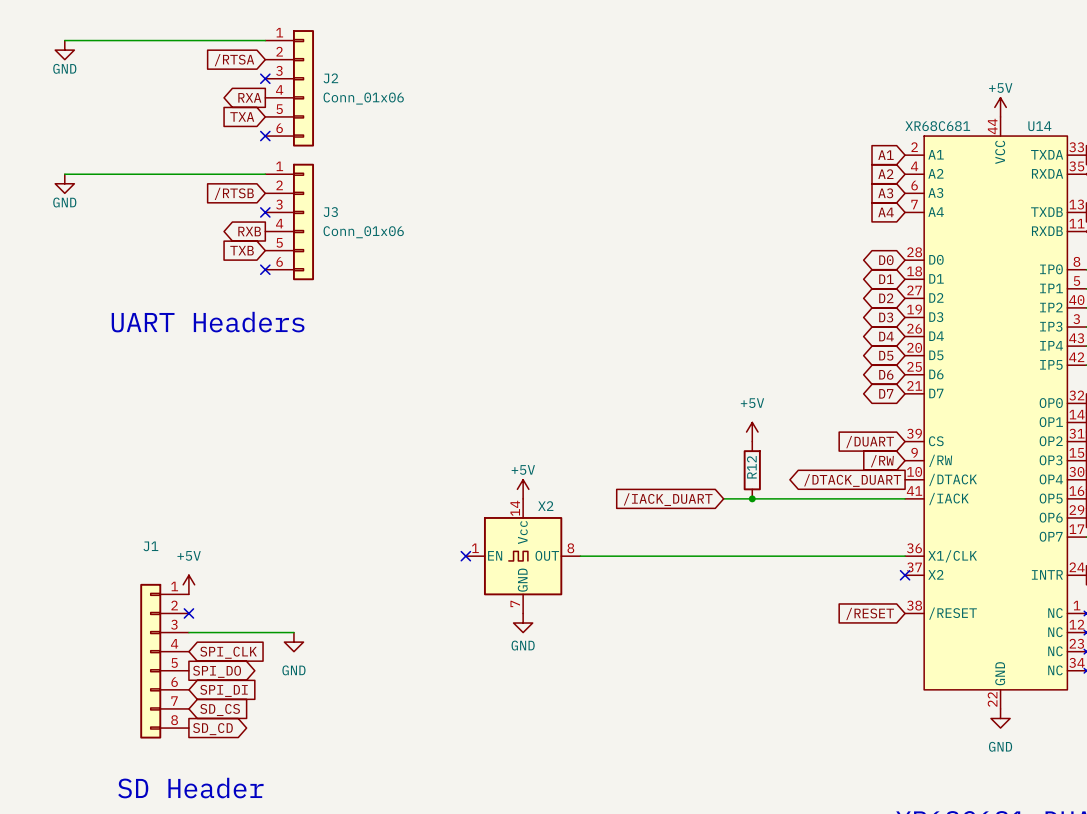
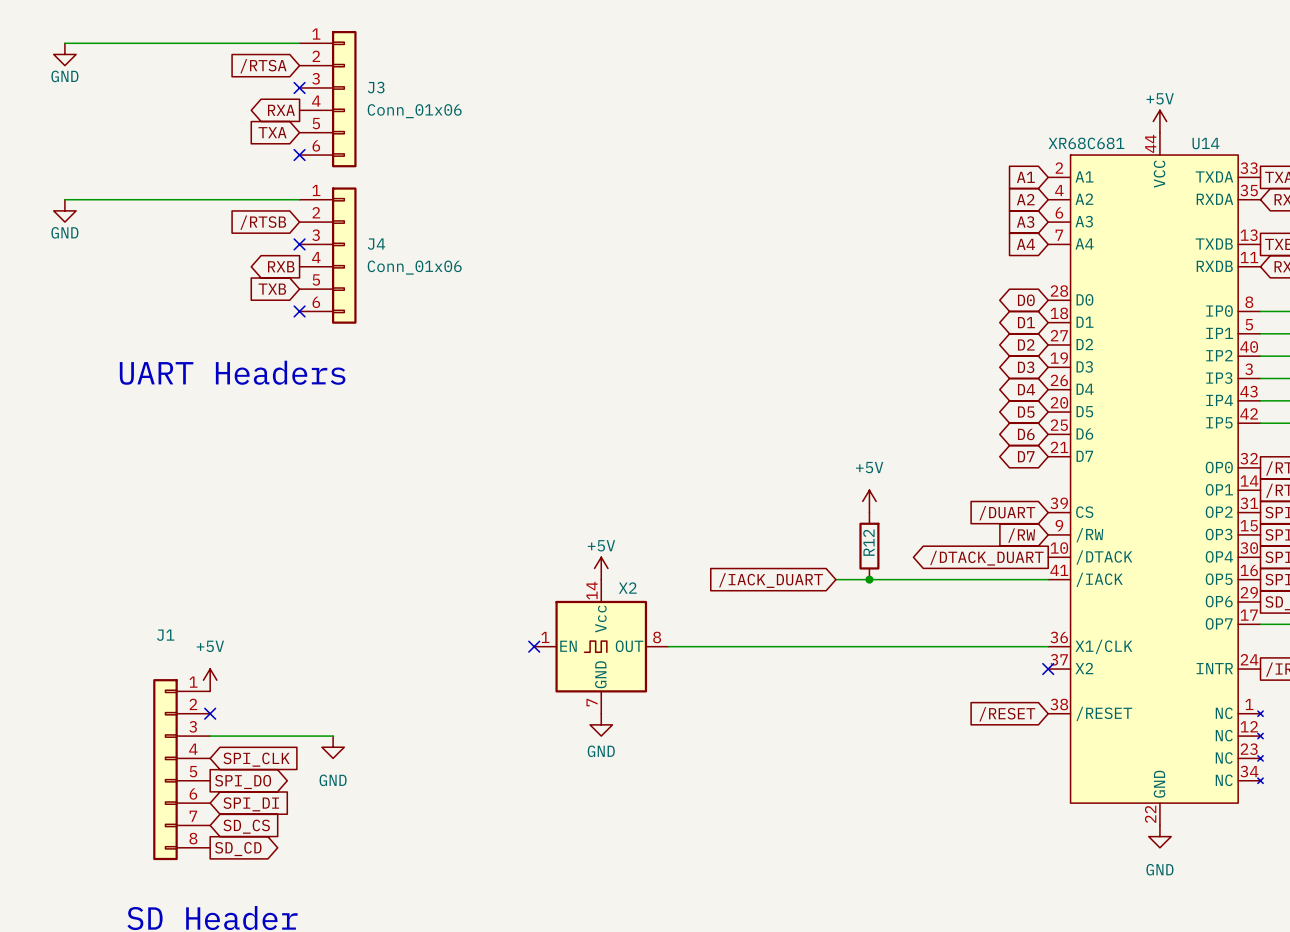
J2 name: J2 (330, 78) -> J3 (376, 87)
J3 name: J3 (330, 212) -> J4 (376, 244)

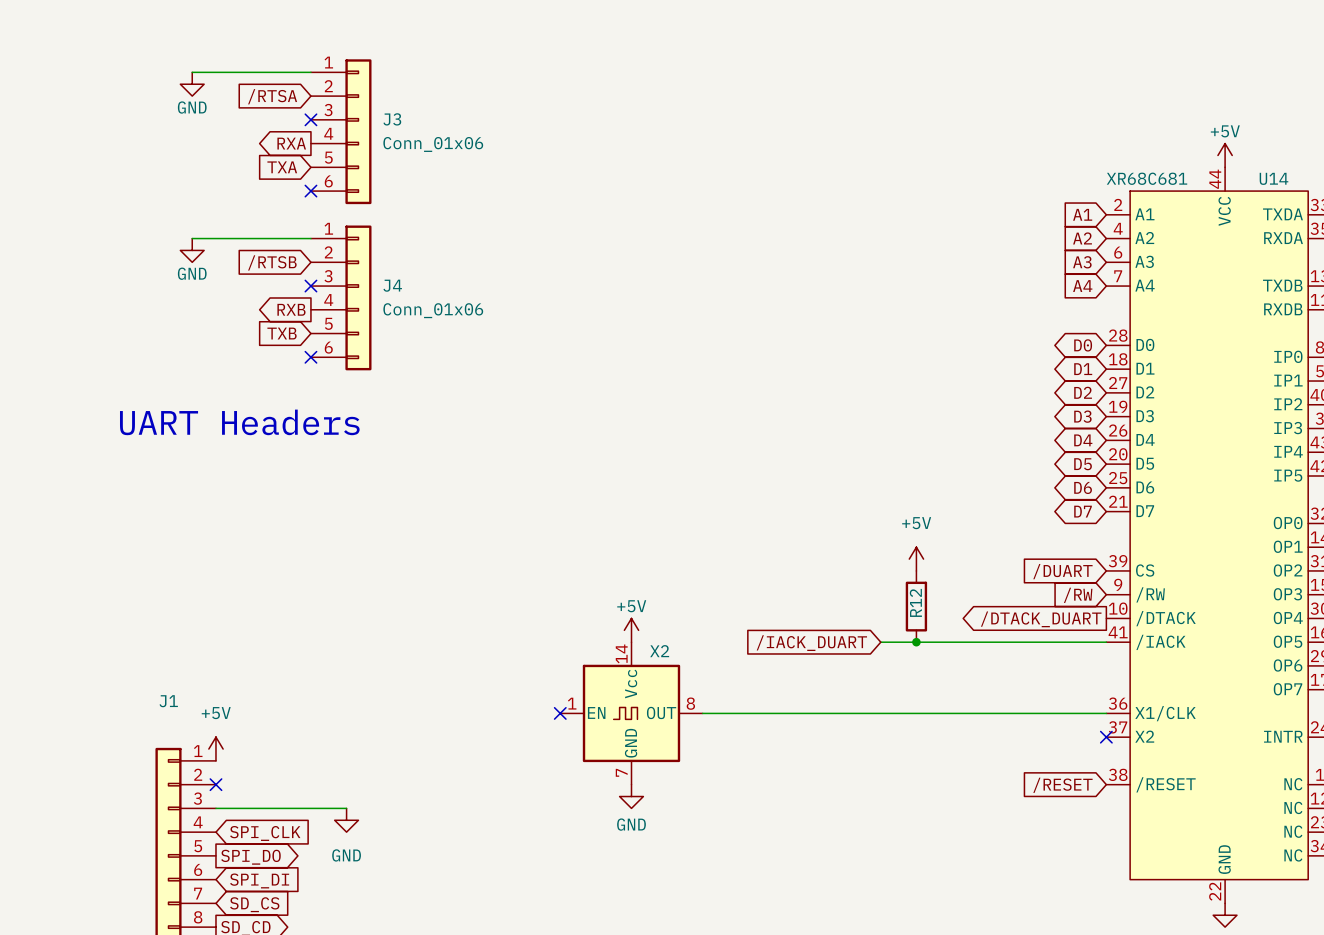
wire: (64, 43) (187, 43) -> none
power symbol: GND (64, 54) -> none
power symbol: none -> GND (192, 84)
wire: (64, 199) (187, 199) -> none
power symbol: GND (64, 210) -> none
power symbol: none -> GND (192, 250)

